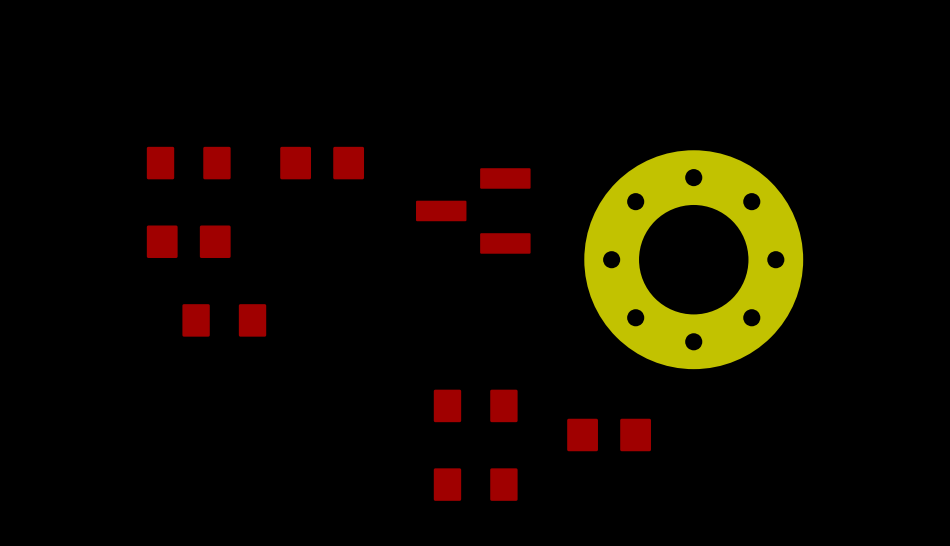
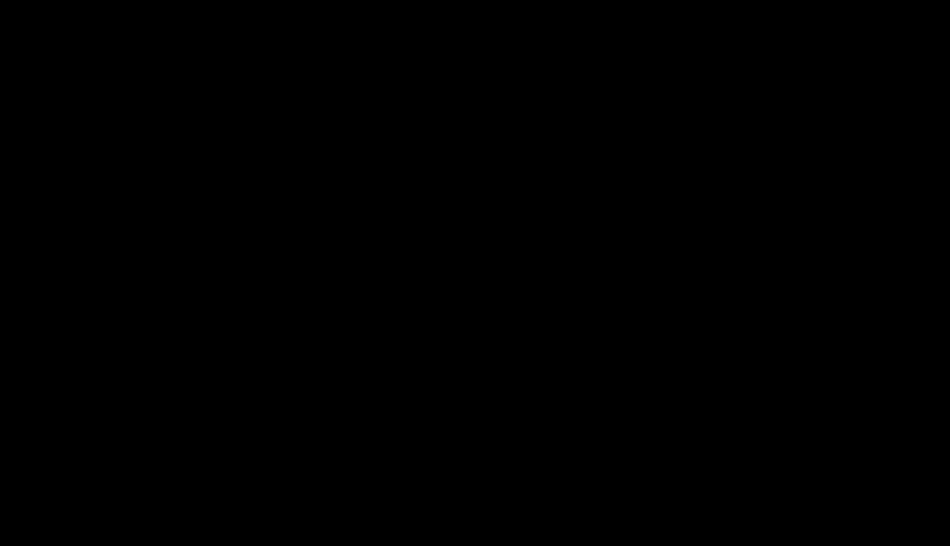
part: (188, 163) -> none
part: (322, 163) -> none
part: (473, 210) -> none
part: (188, 241) -> none
part: (693, 259) -> none
part: (224, 320) -> none
part: (475, 405) -> none
part: (609, 434) -> none
part: (475, 484) -> none

